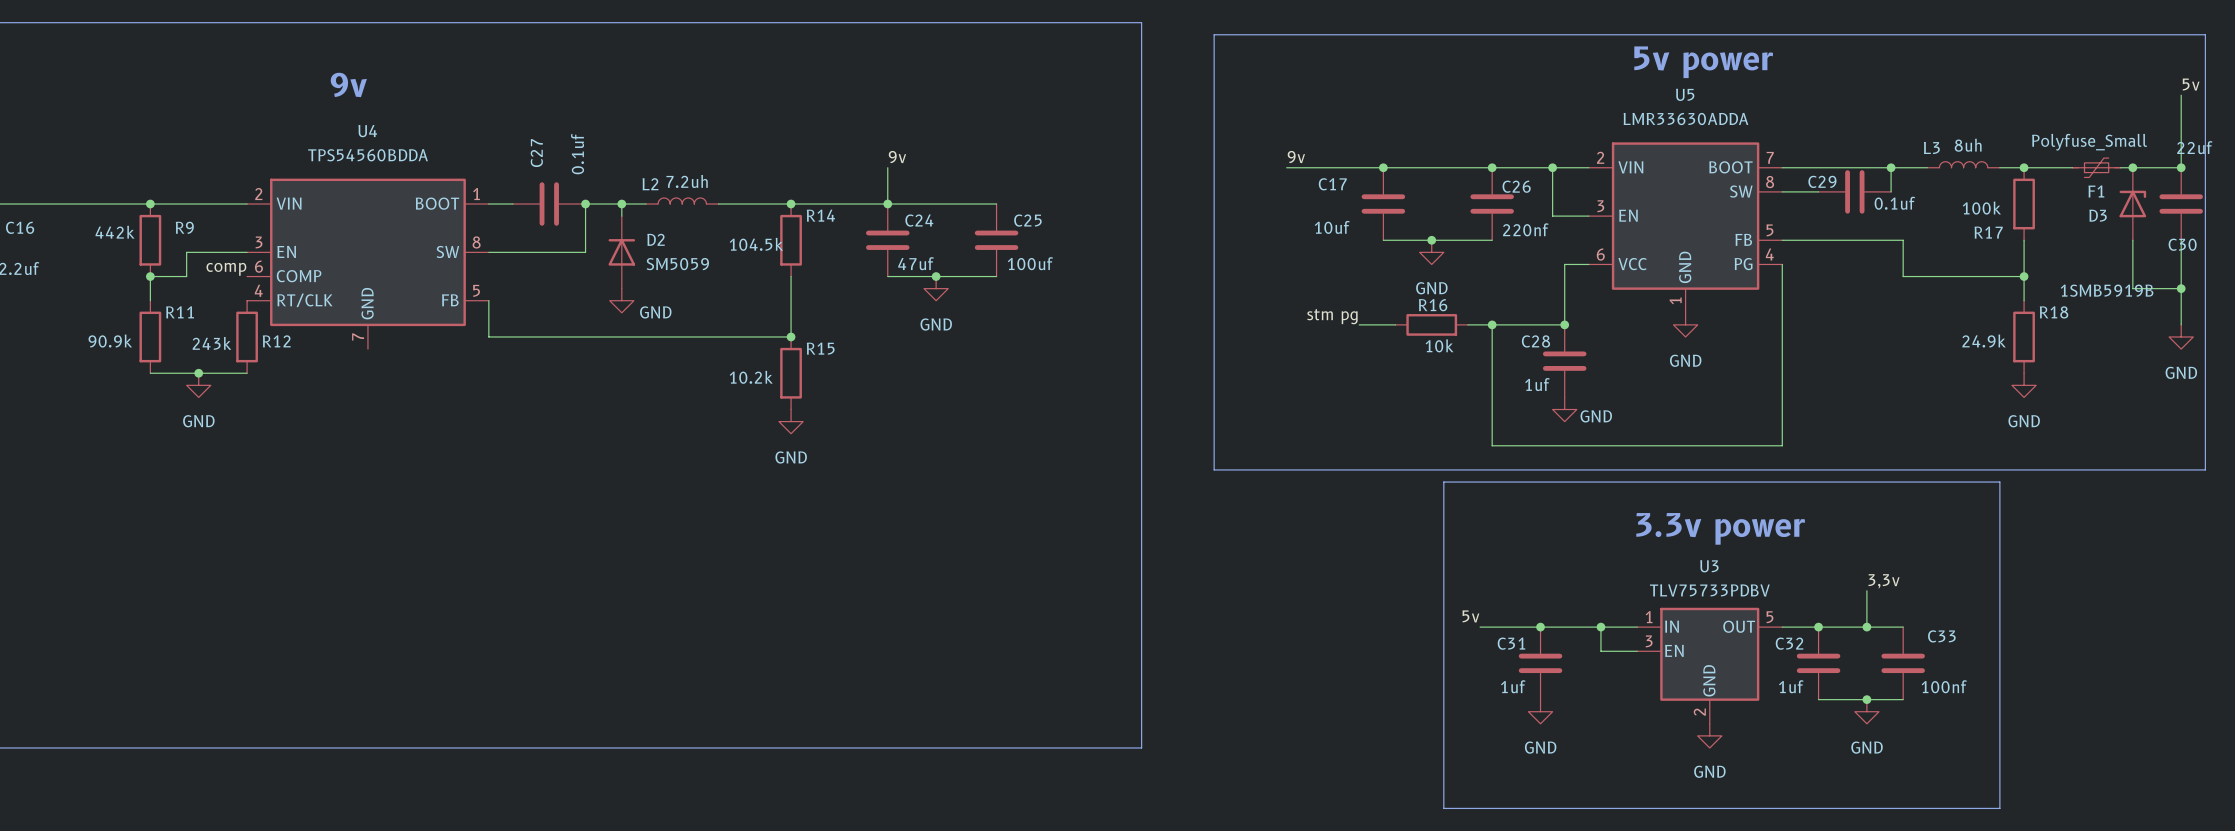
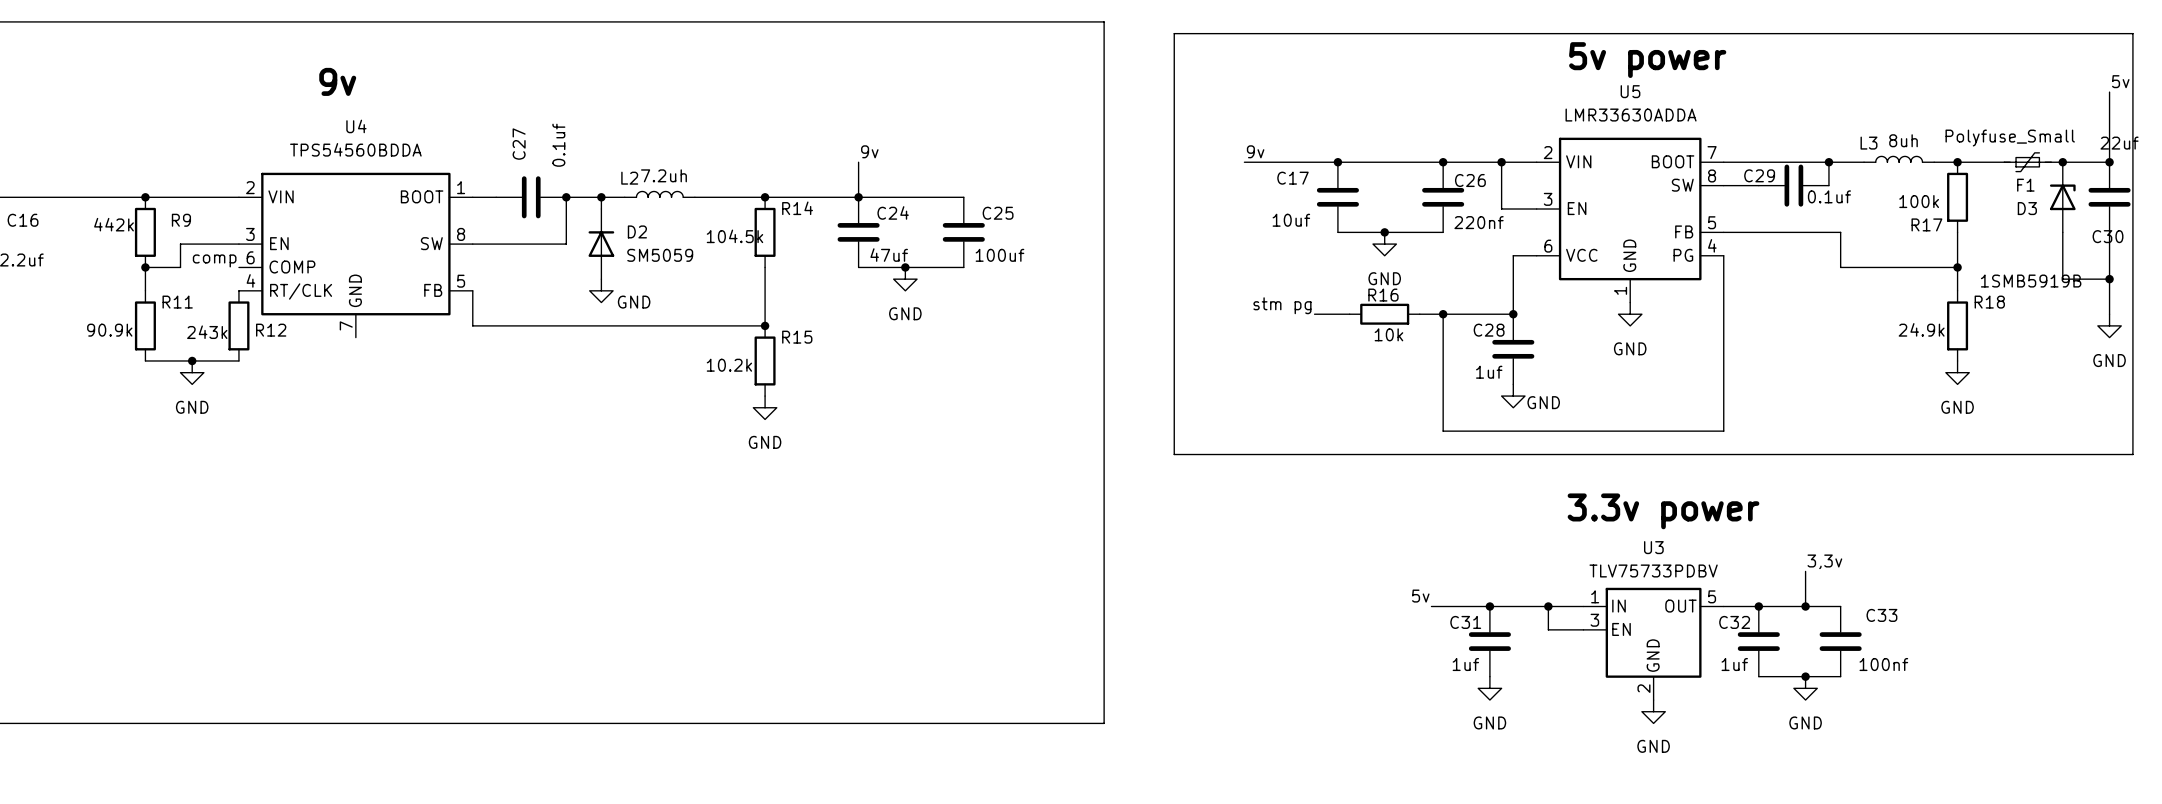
line: (1443, 482) (1999, 482) (1999, 808) (1443, 808) (1443, 482) -> none

